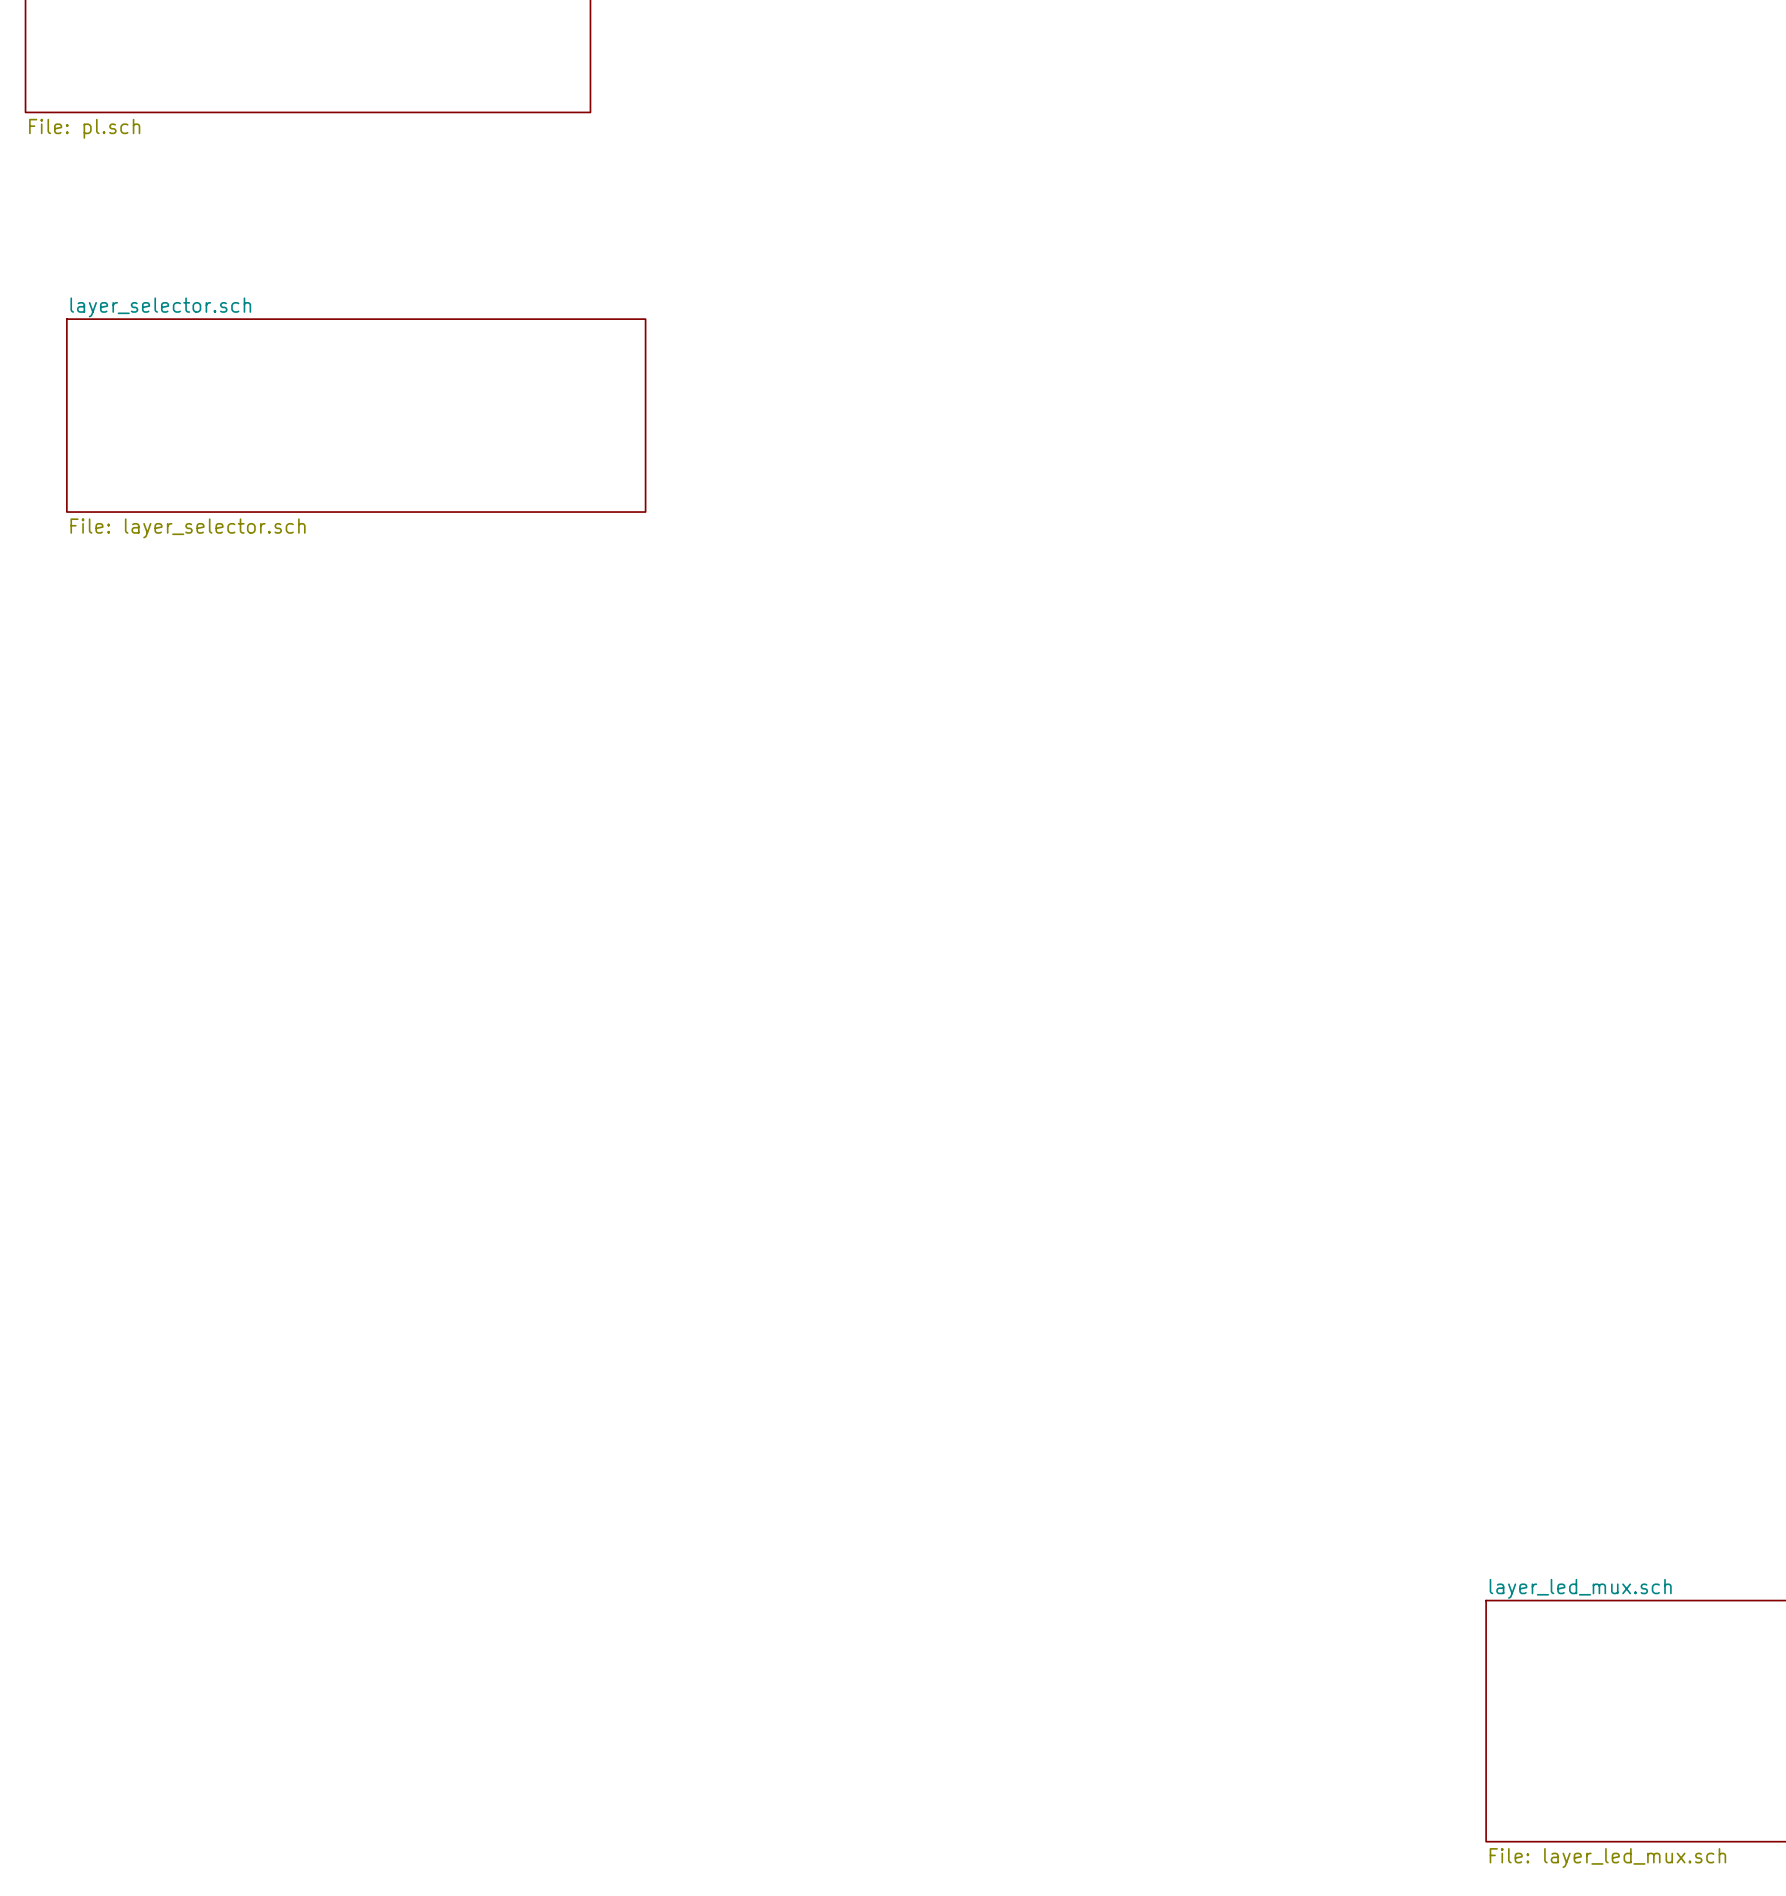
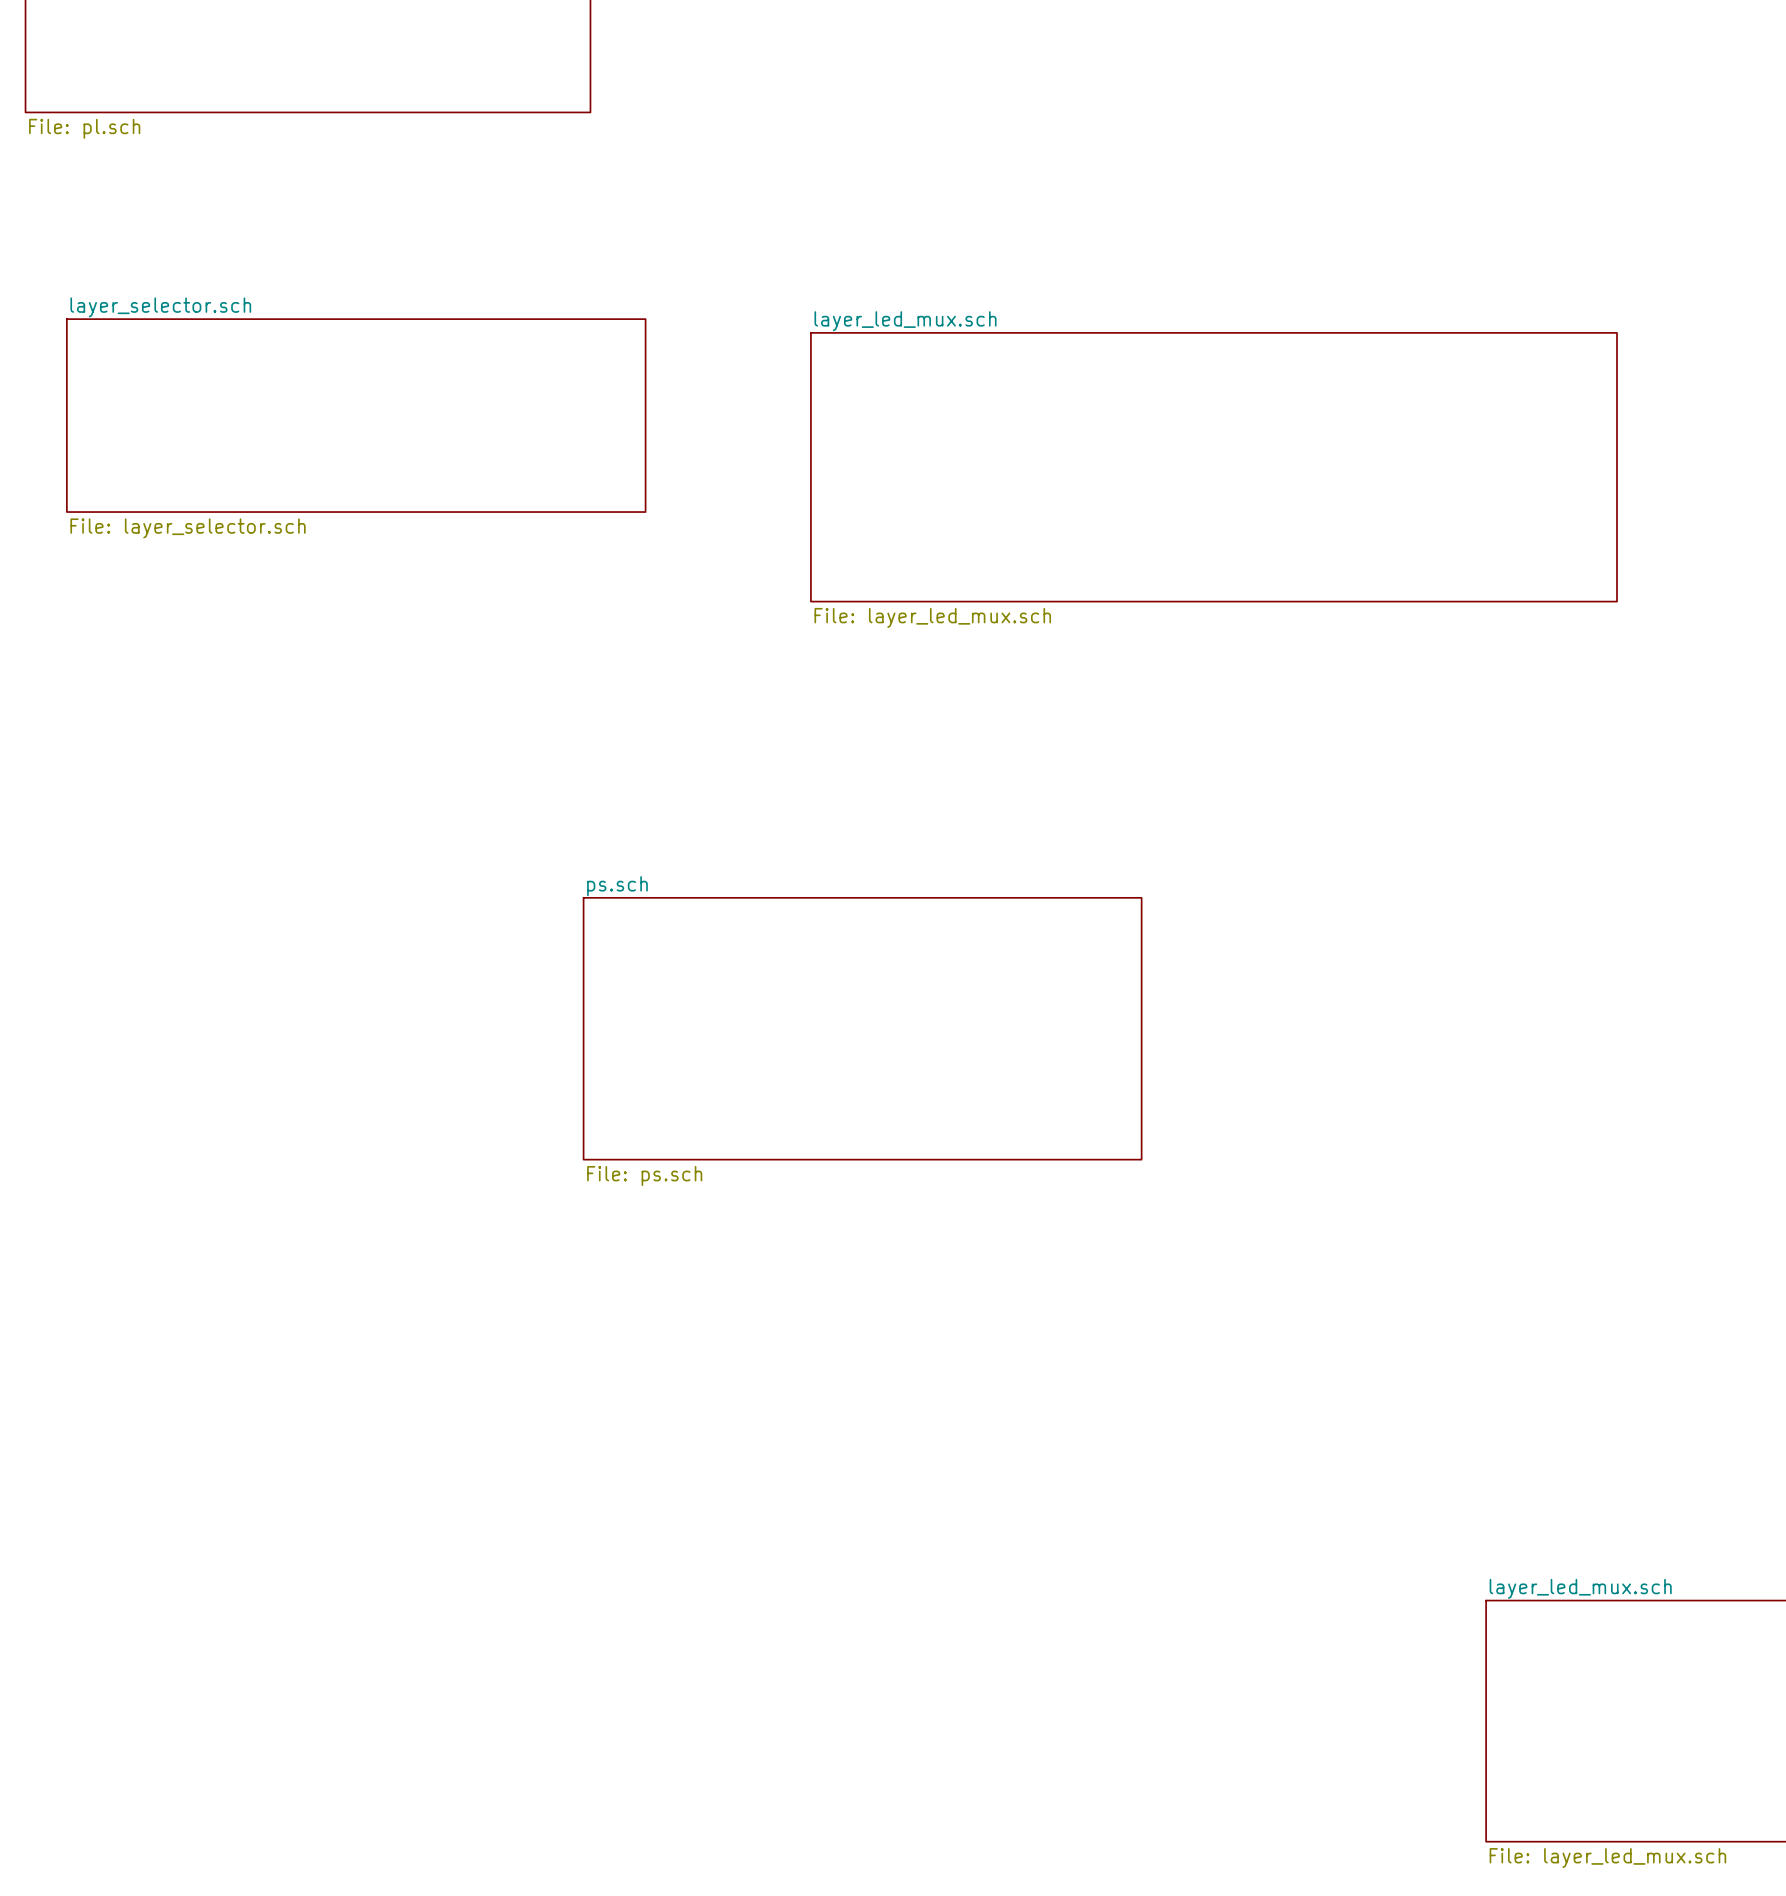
sheet layer_led_mux.sch: none -> File: layer_led_mux.sch (1213, 467)
sheet ps.sch: none -> File: ps.sch (862, 1028)

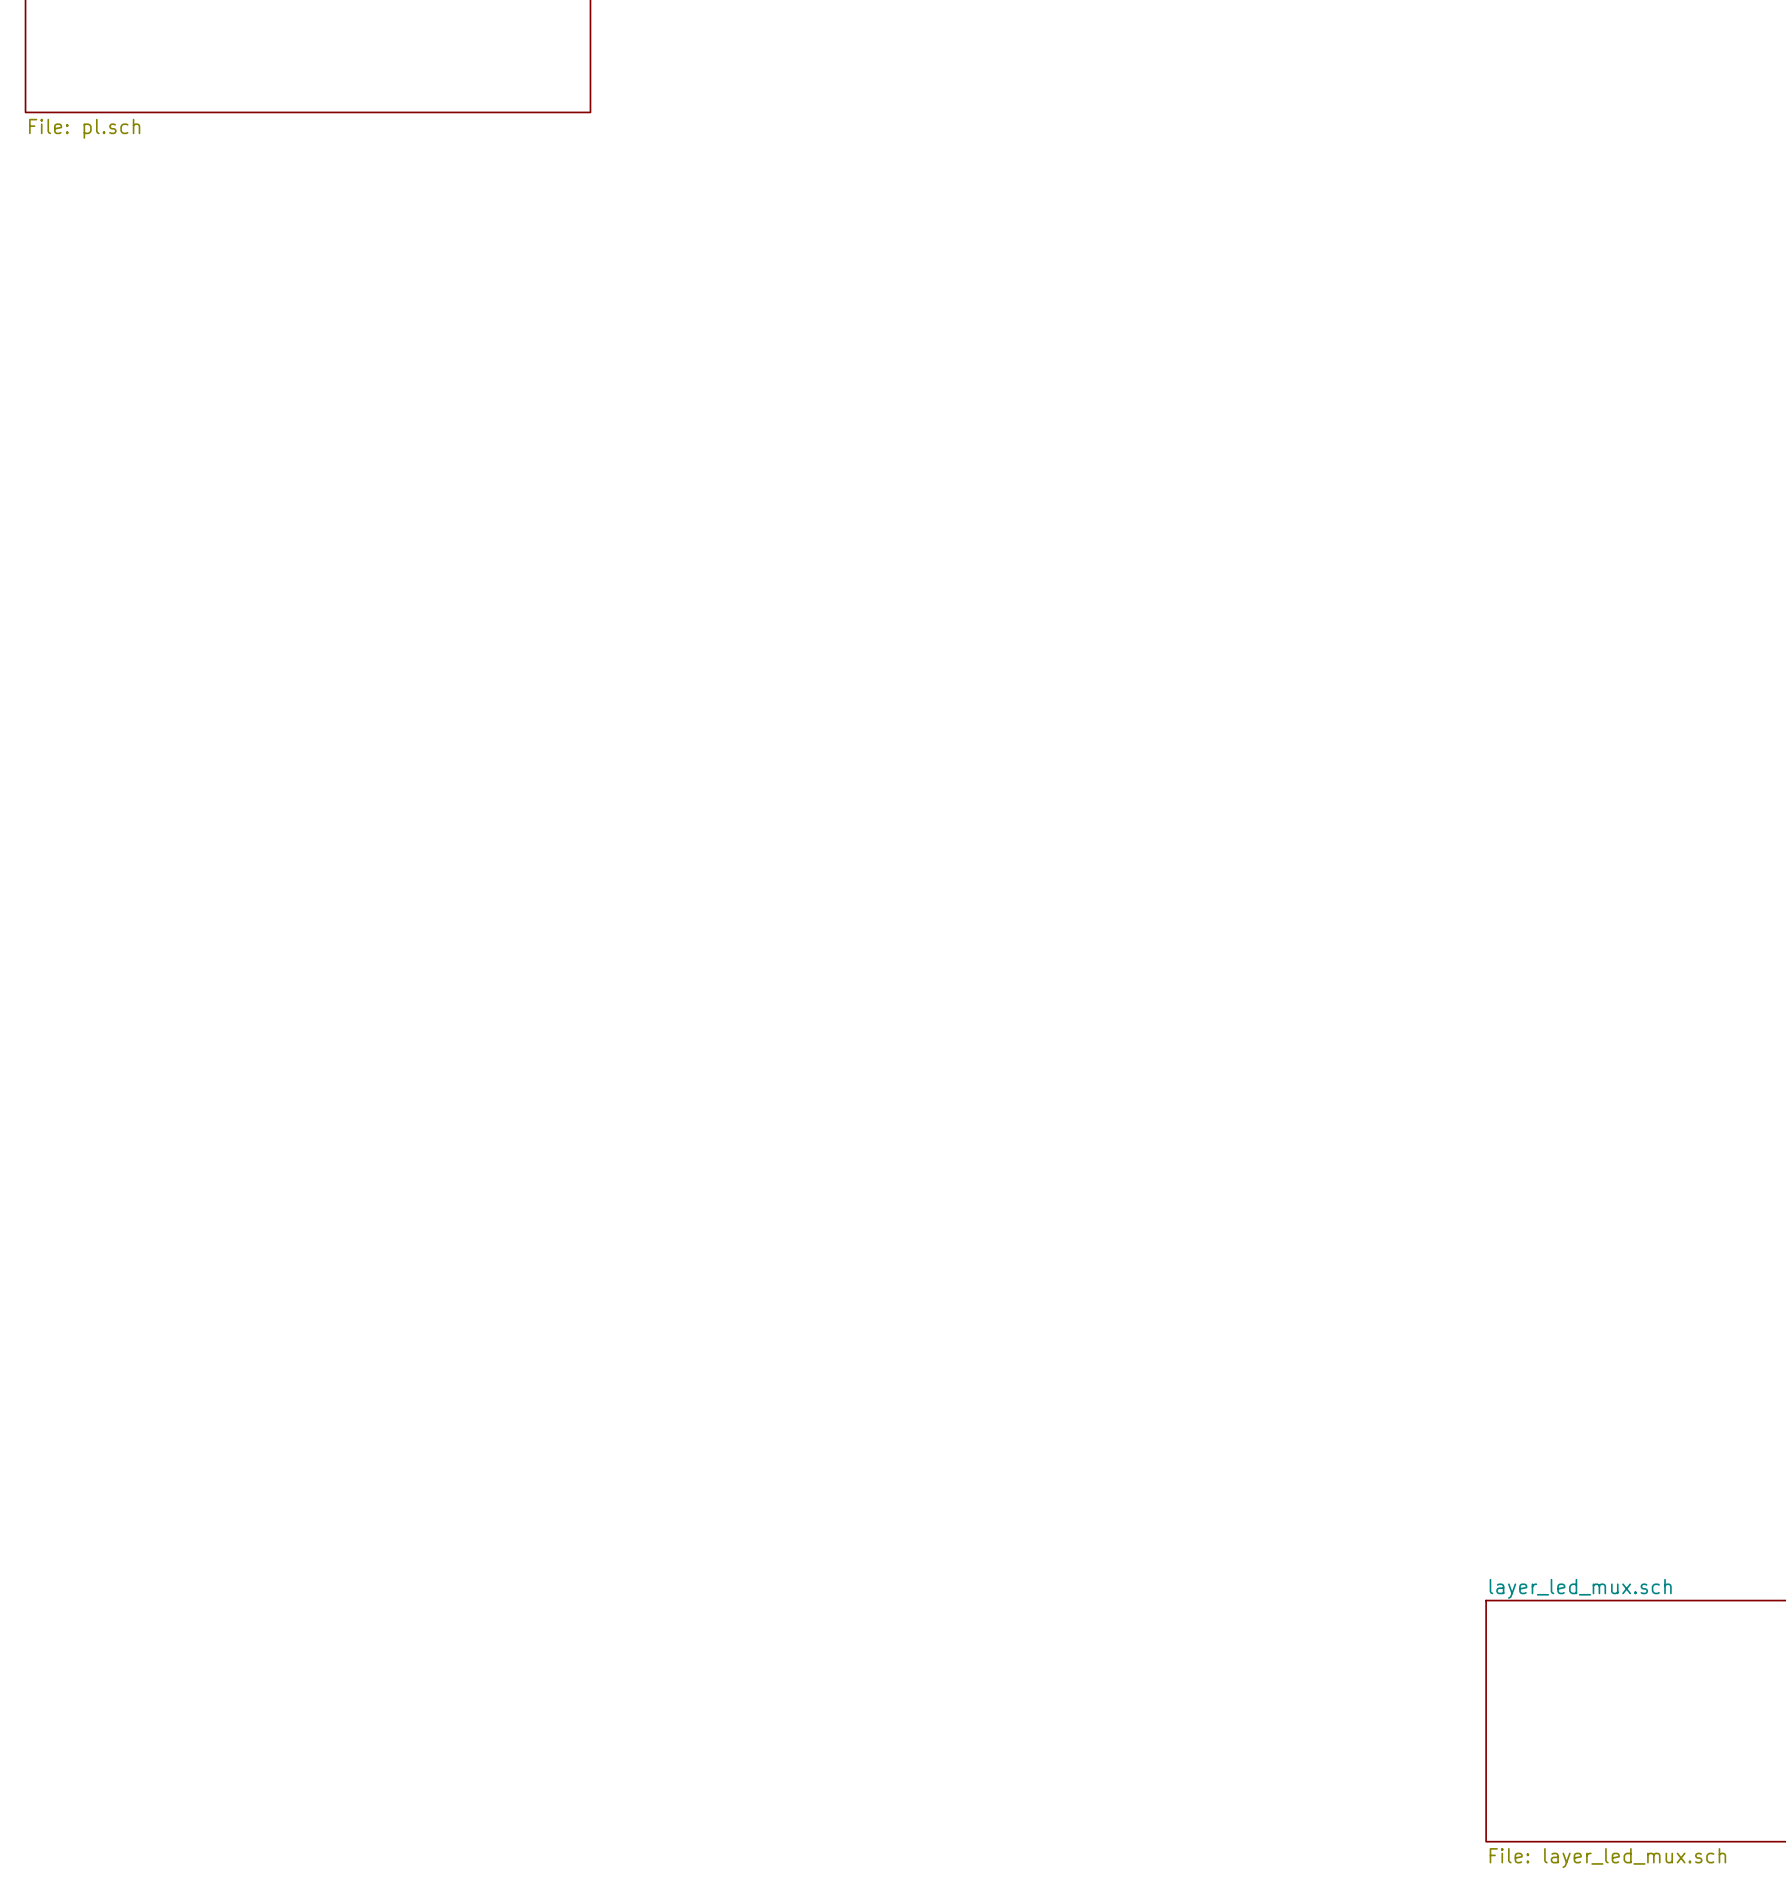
sheet layer_selector.sch: File: layer_selector.sch (356, 415) -> none
sheet layer_led_mux.sch: File: layer_led_mux.sch (1213, 467) -> none
sheet ps.sch: File: ps.sch (862, 1028) -> none

